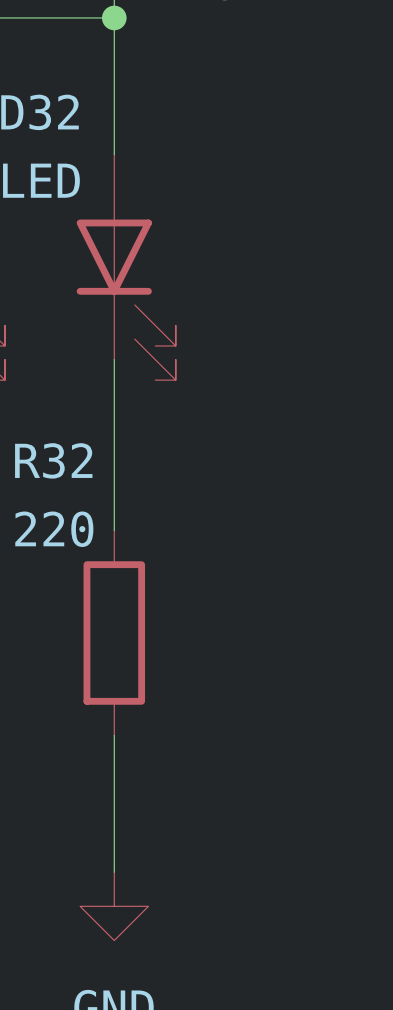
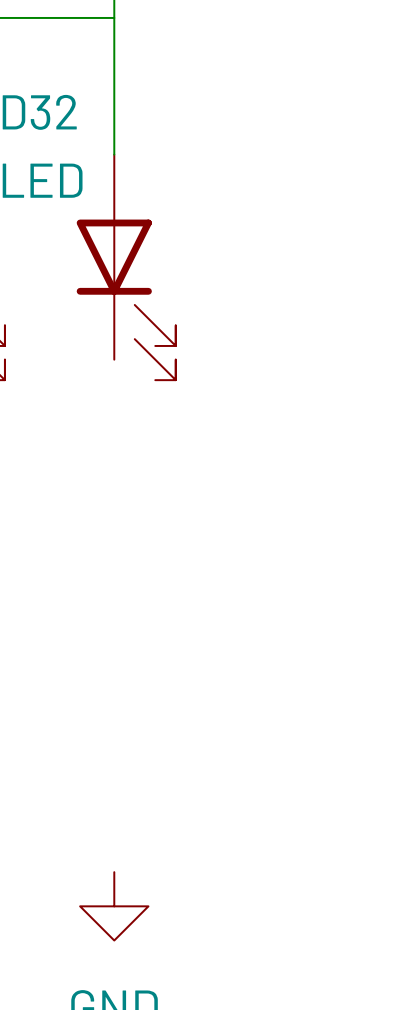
junction: (114, 17) -> none
wire: (114, 359) (114, 530) -> none
R32: 220 (114, 632) -> none
wire: (114, 735) (114, 872) -> none

